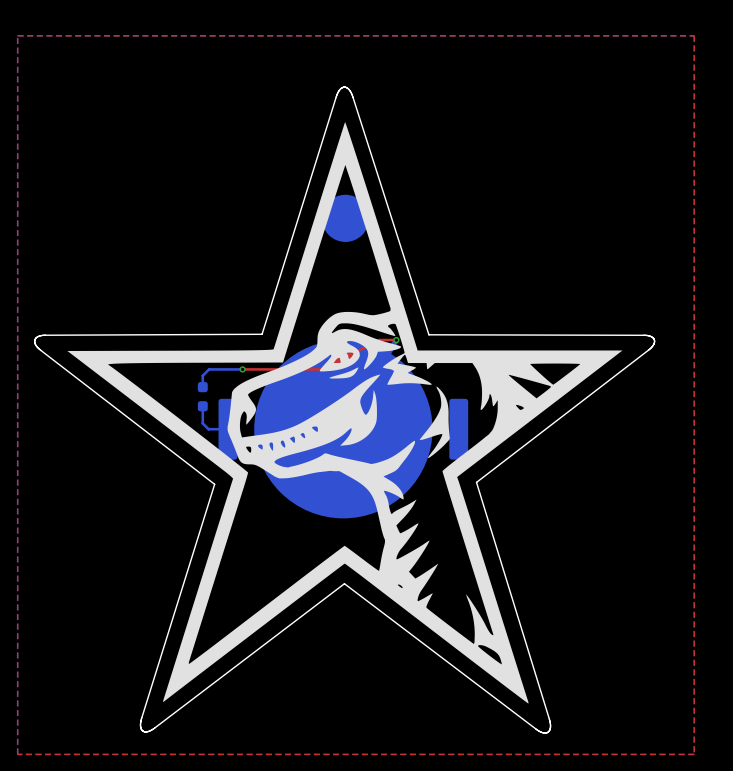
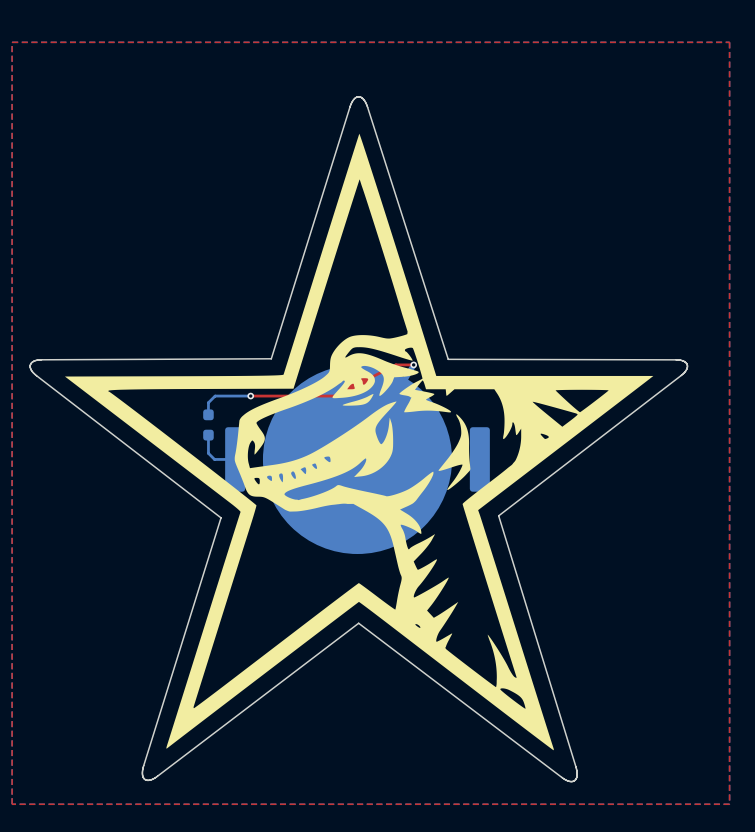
part: (345, 218) -> none

